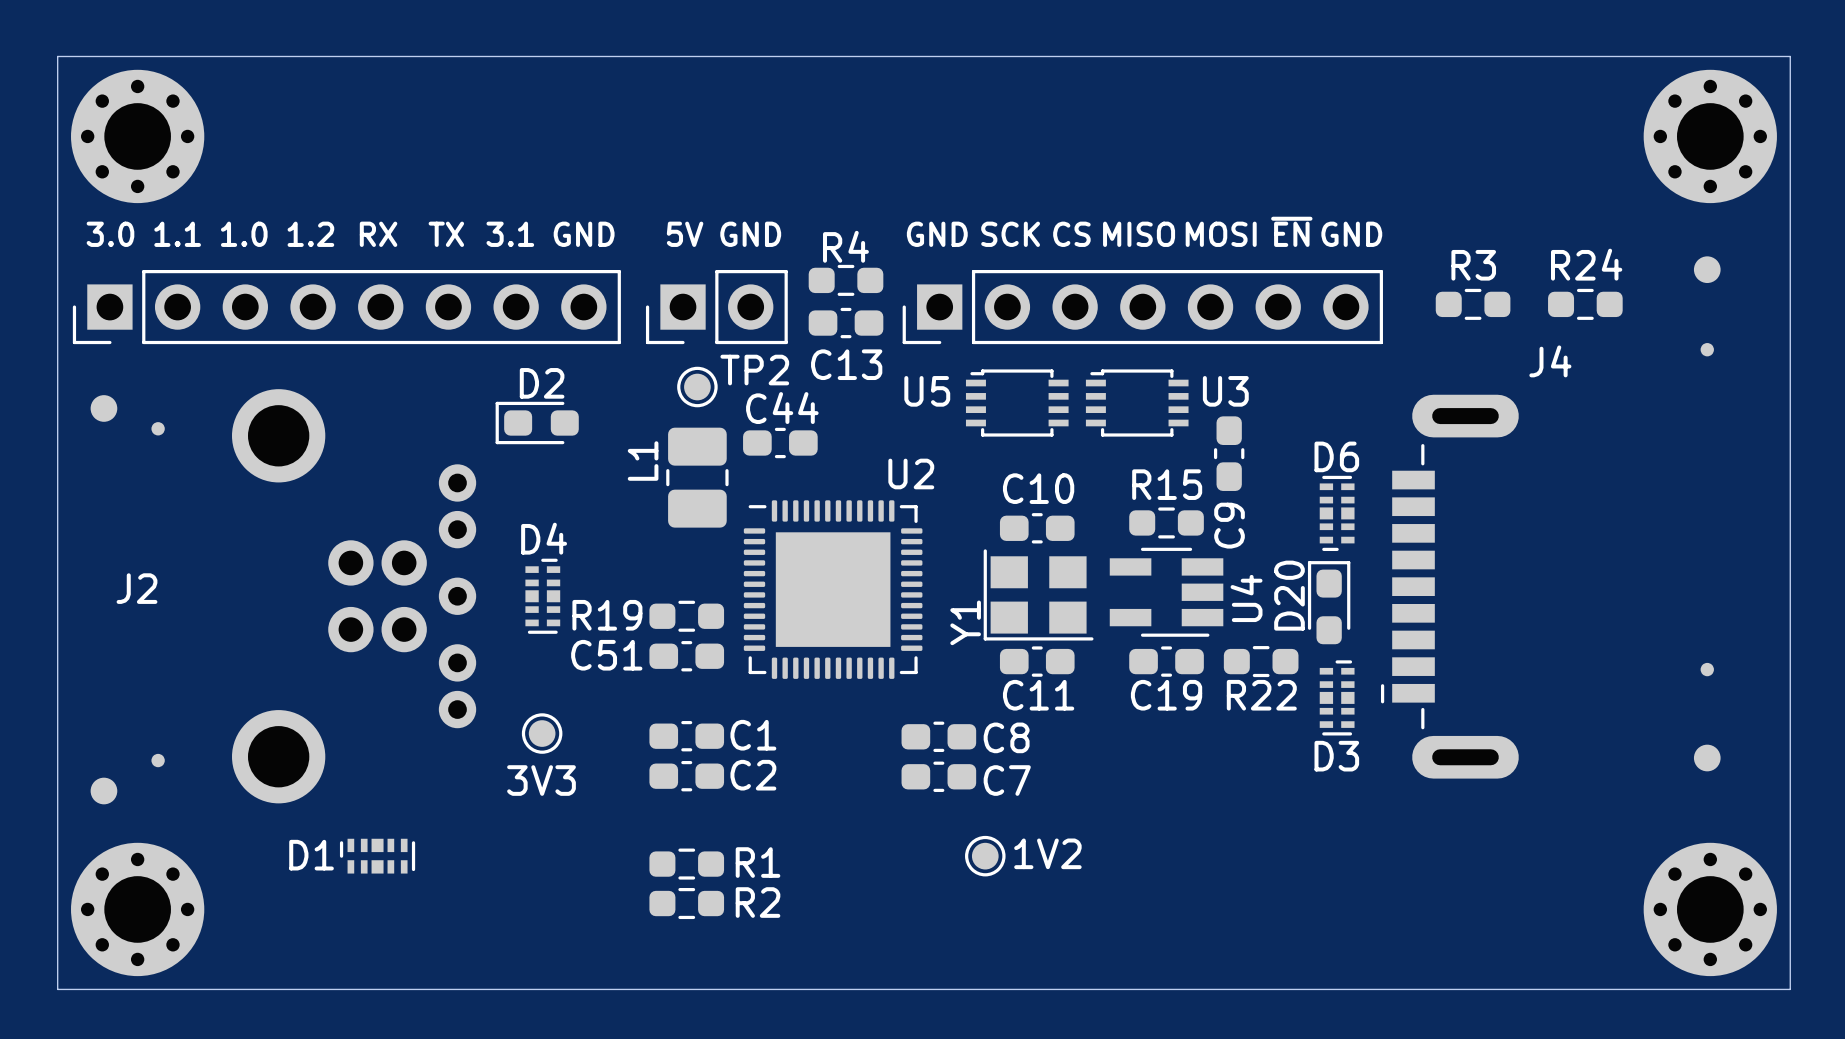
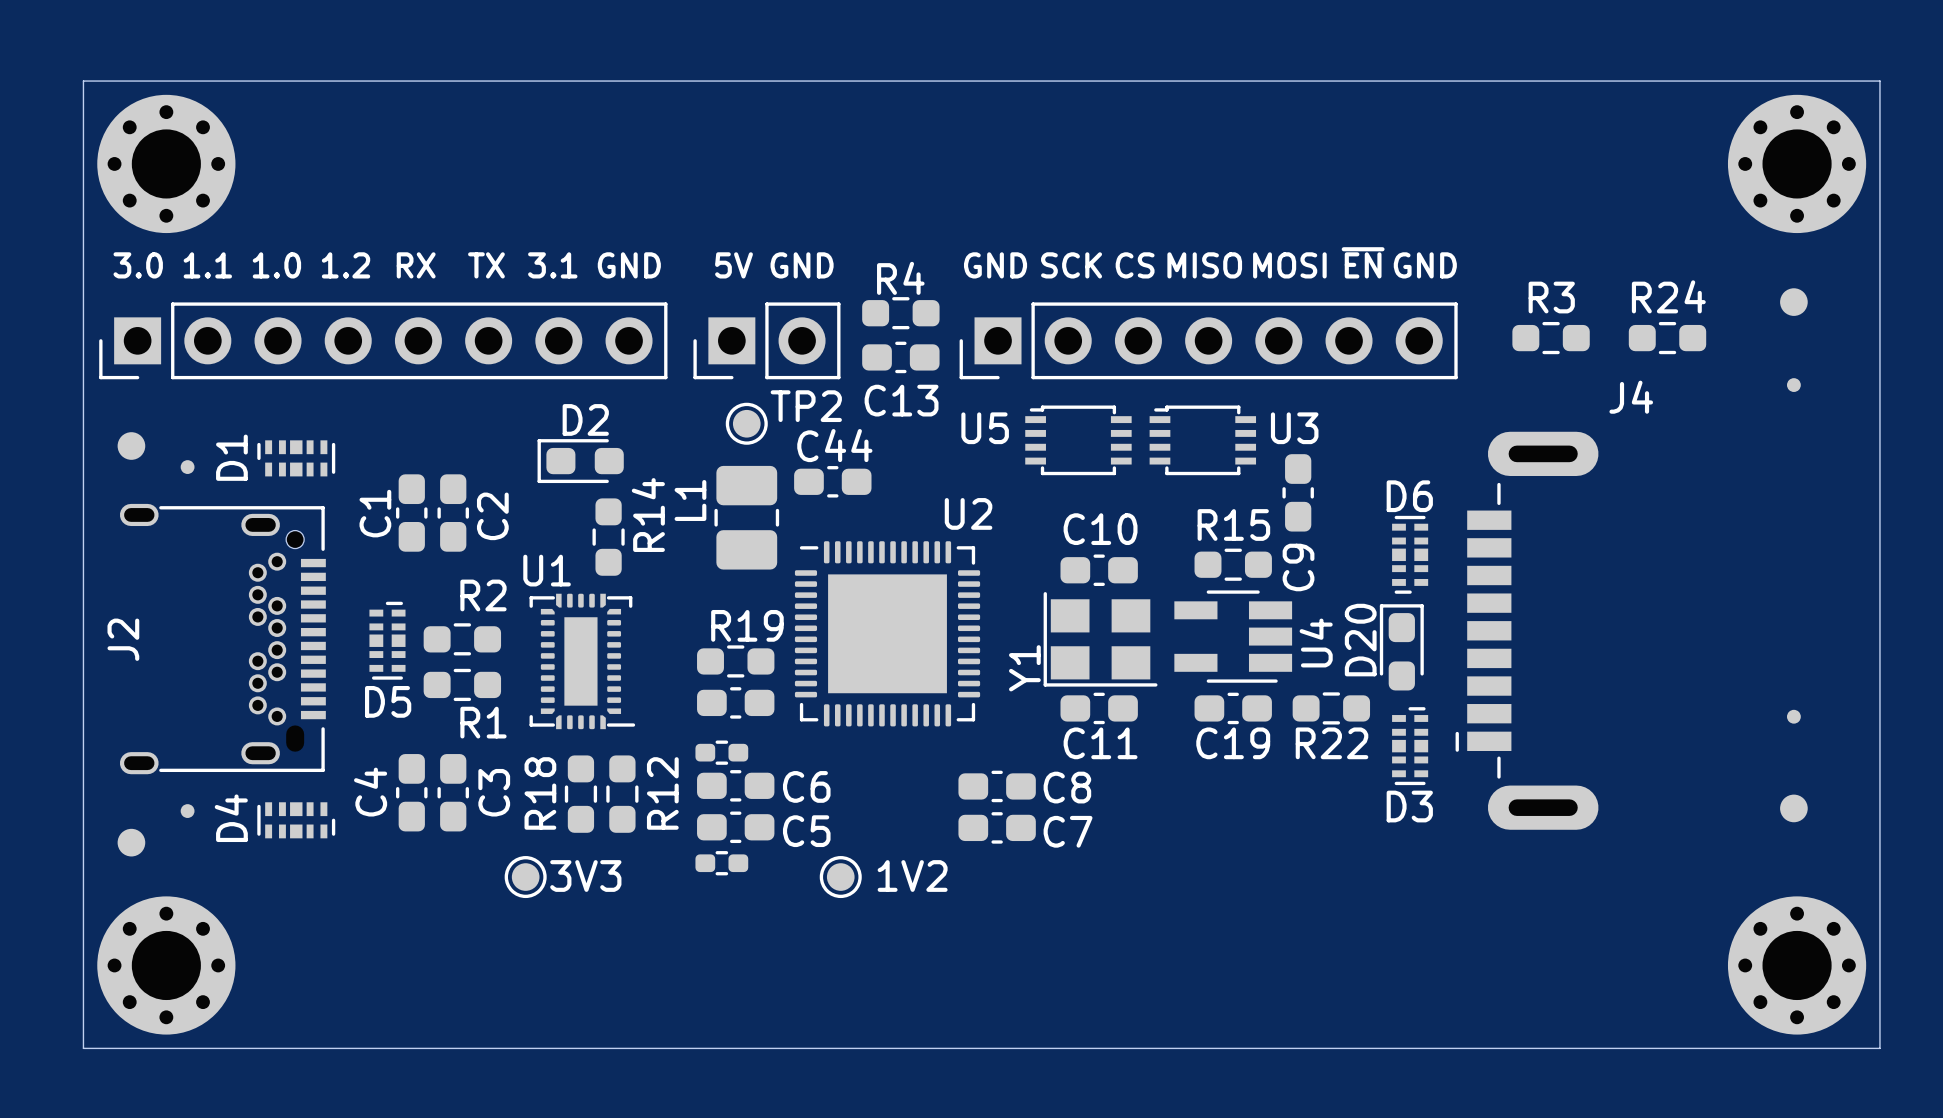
J2 footprint: [232, 389, 477, 804] -> [119, 503, 326, 775]
C1: none -> (411, 513)
C2: none -> (453, 513)
R14: none -> (608, 537)
D4 name position: D4 (544, 538) -> D4 (231, 818)
J2 name position: J2 (137, 588) -> J2 (123, 639)
D5: none -> (387, 640)
D4 rotation: 0° (542, 596) -> 90° clockwise (296, 820)
D4 position: (542, 596) -> (296, 820)
R19 name position: R19 (607, 615) -> R19 (747, 625)
U1: none -> (582, 661)
C51 name: C51 (606, 655) -> none
part: none -> (721, 752)
part: (542, 733) -> none
C1 name: C1 (753, 735) -> C6 (806, 786)
C4: none -> (411, 792)
C3: none -> (453, 792)
R18: none -> (580, 794)
R12: none -> (622, 794)
C2 name: C2 (753, 775) -> C5 (806, 831)
part: none -> (721, 863)
part: none -> (525, 877)
part: none -> (840, 877)
D1 name rotation: 0° (311, 855) -> 90° counterclockwise (231, 457)
D1 position: (377, 856) -> (296, 458)
part: (985, 856) -> none
R1 name position: R1 (758, 862) -> R1 (483, 722)
R1 position: (686, 864) -> (462, 684)
R2 name position: R2 (758, 902) -> R2 (483, 595)
R2 position: (686, 903) -> (462, 639)

